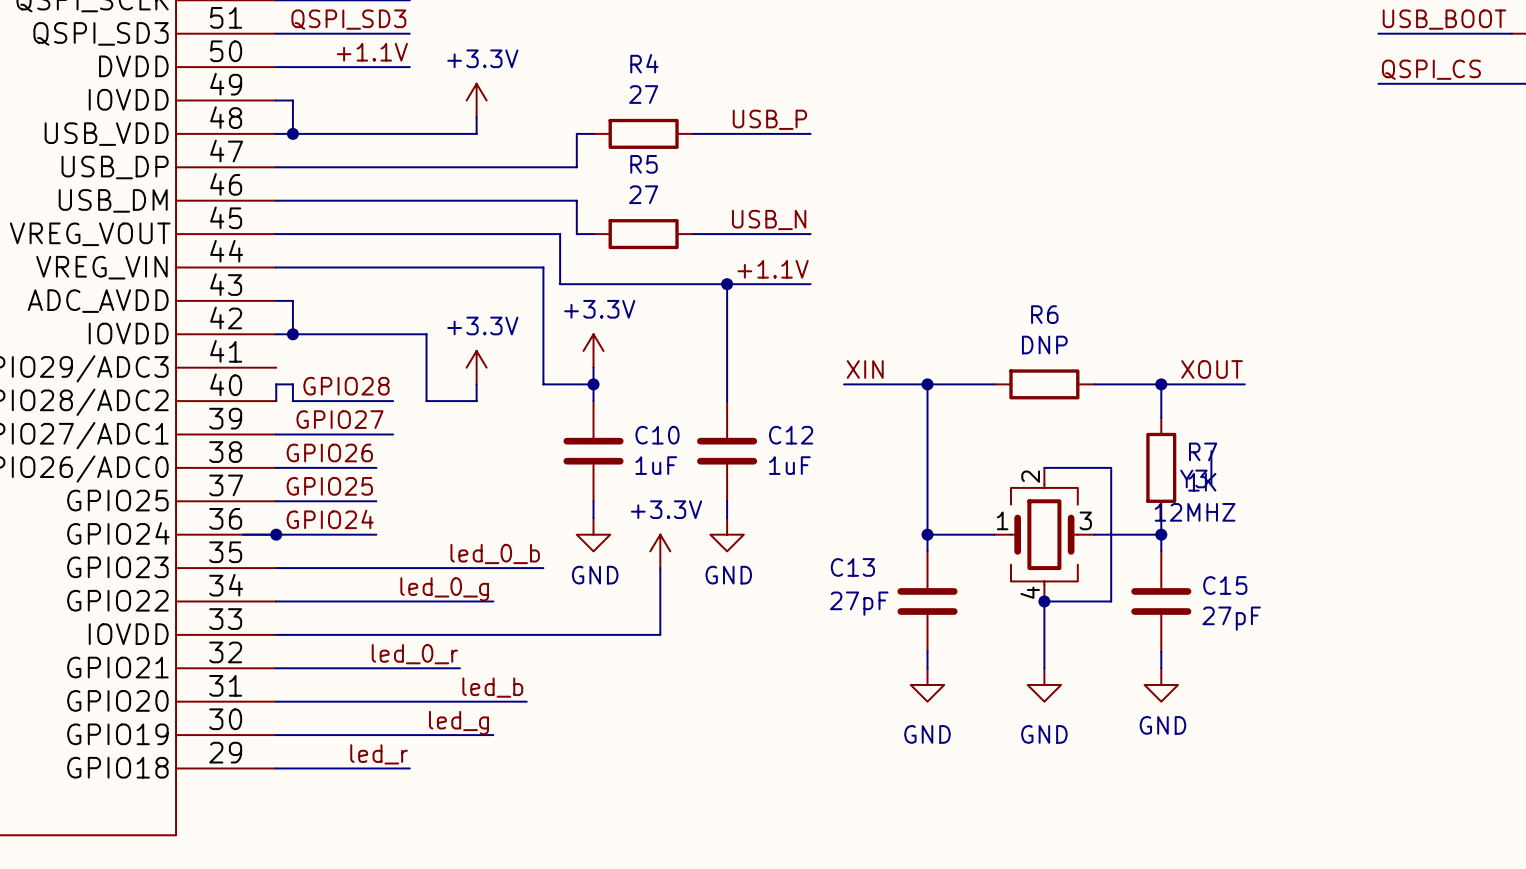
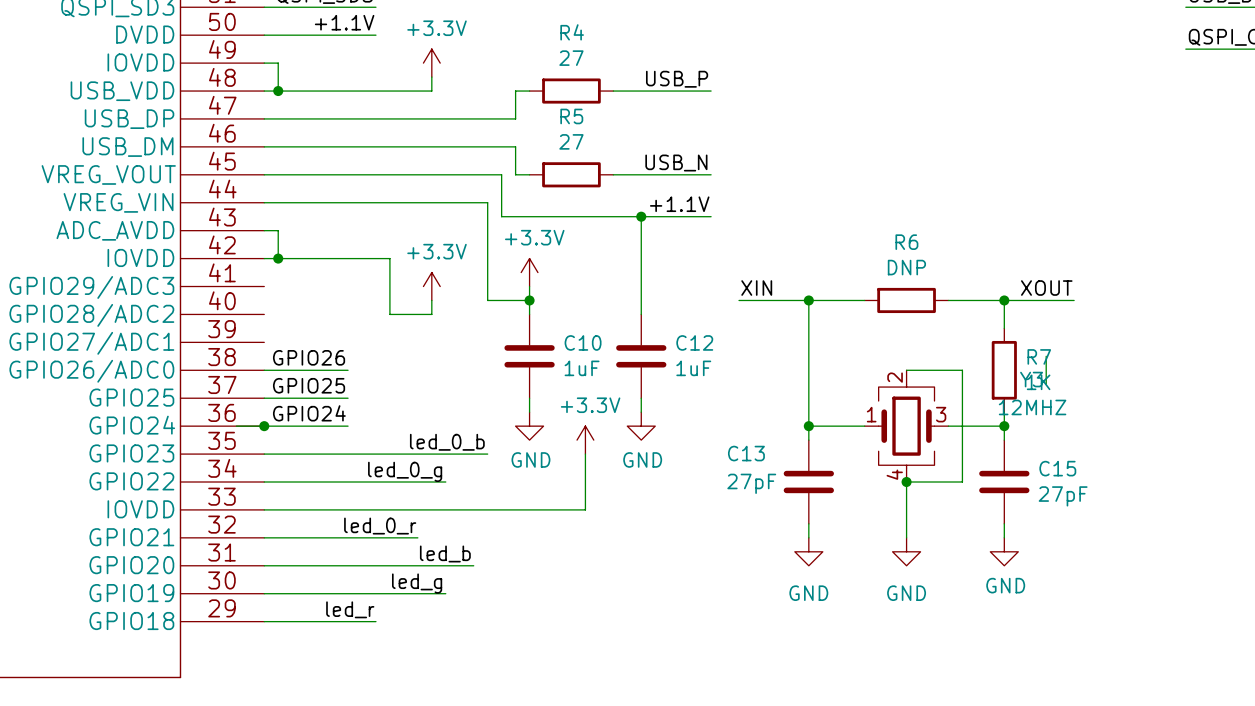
label: GPIO28 (346, 386) -> none
wire: (276, 401) (276, 384) (292, 384) (292, 401) (393, 401) -> none
label: GPIO27 (339, 419) -> none
wire: (276, 434) (393, 434) -> none

